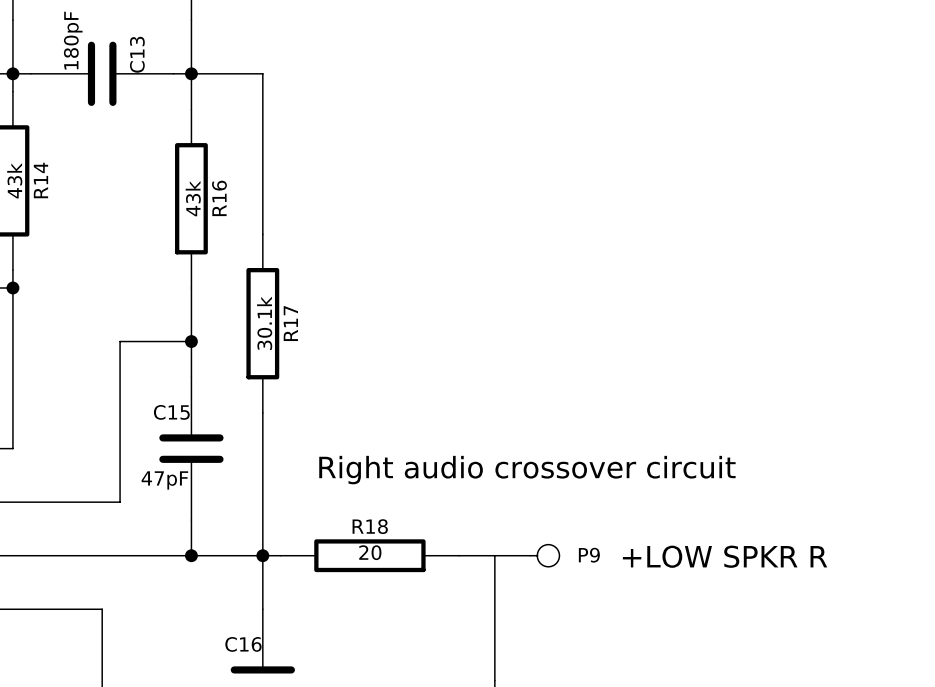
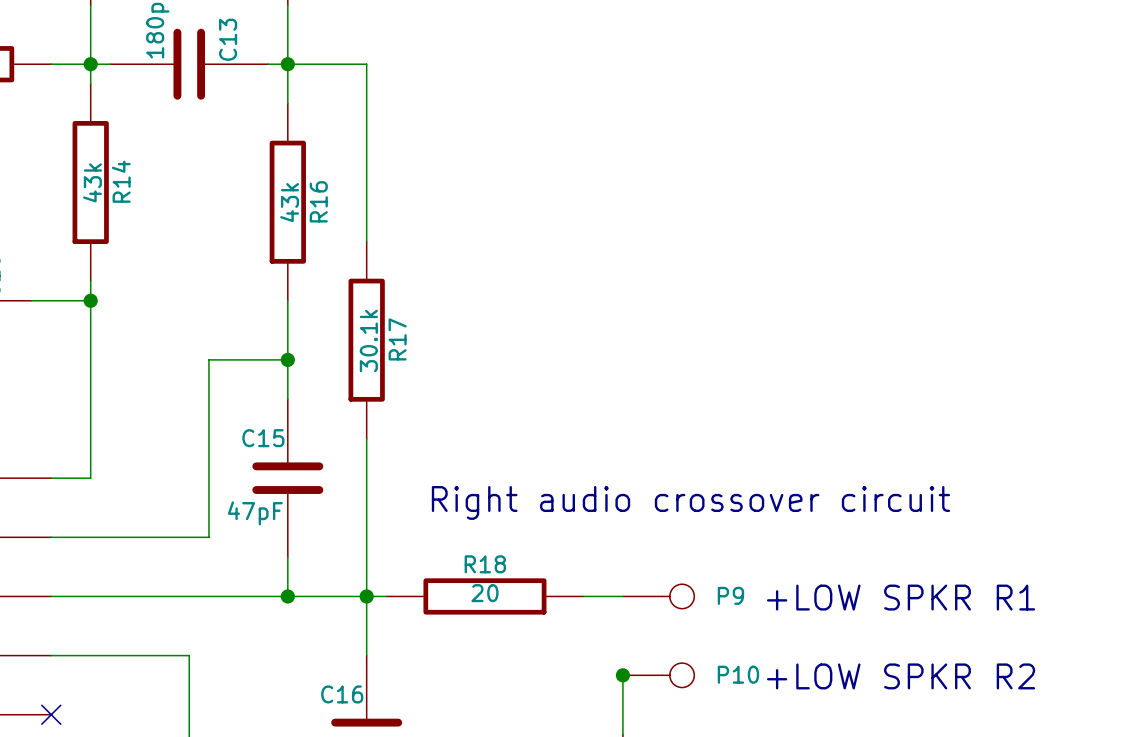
wire: (494, 555) (494, 627) -> none
text: +LOW SPKR R (725, 556) -> +LOW SPKR R1 (901, 597)
junction: none -> (622, 675)
P10: none -> (658, 675)
text: none -> +LOW SPKR R2 (901, 676)

